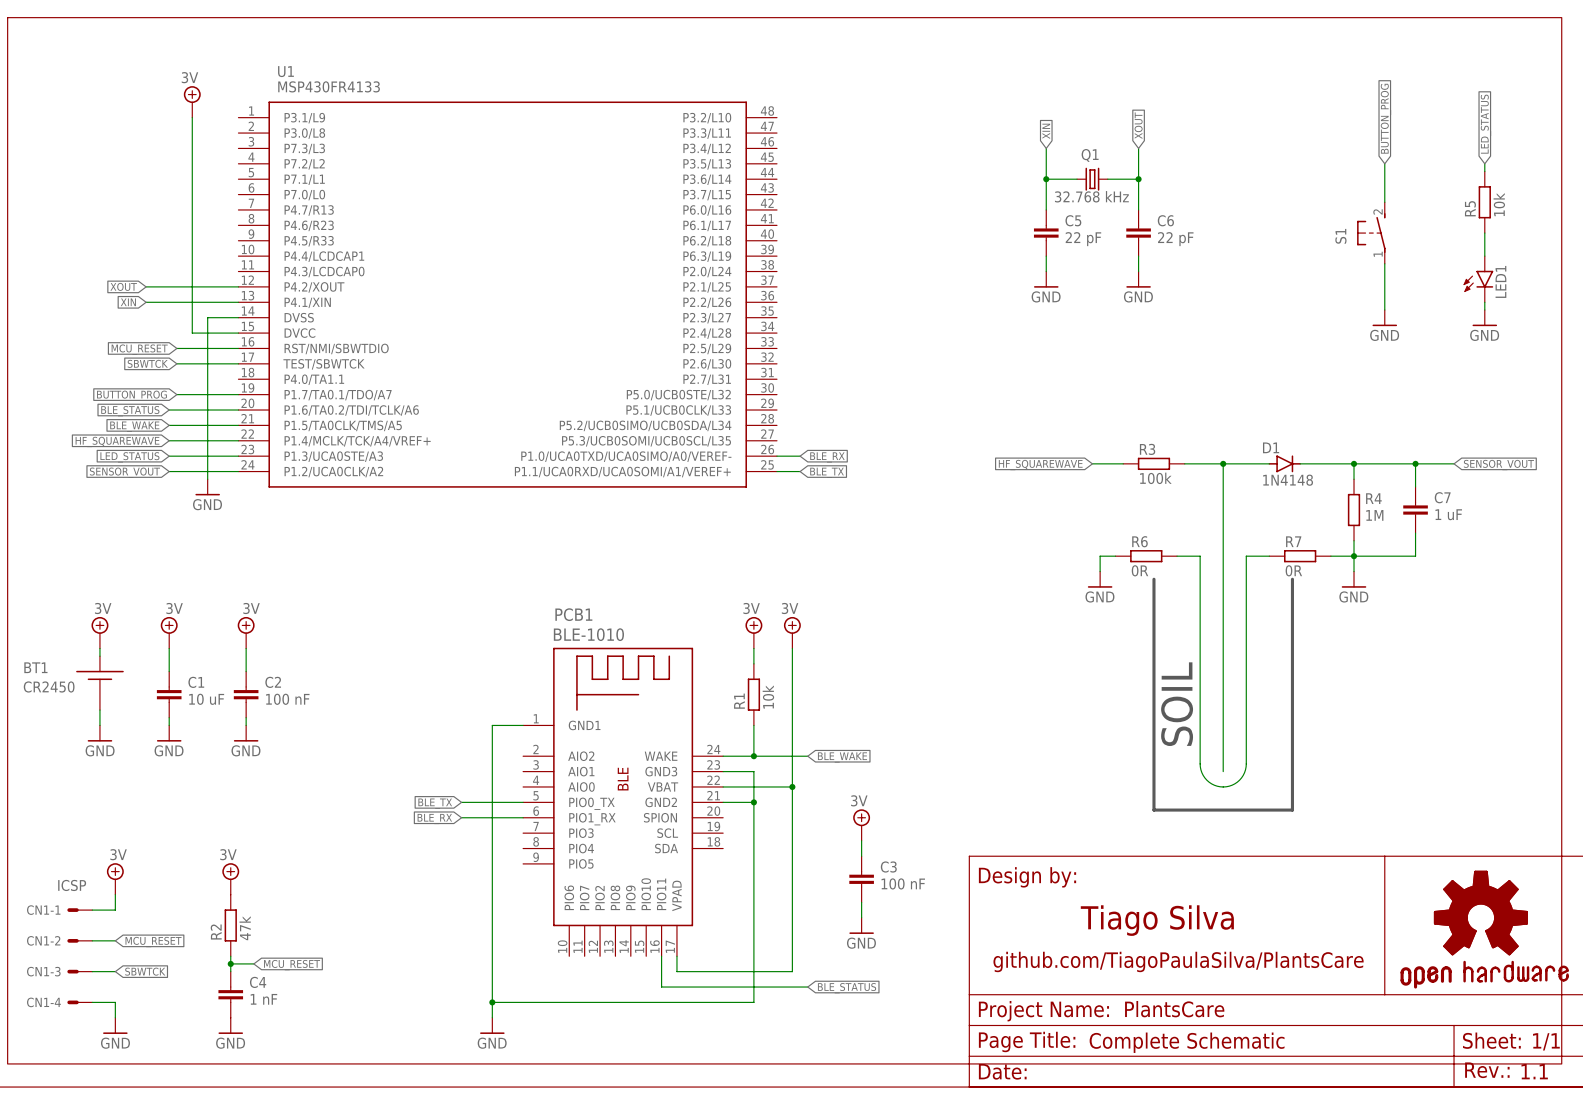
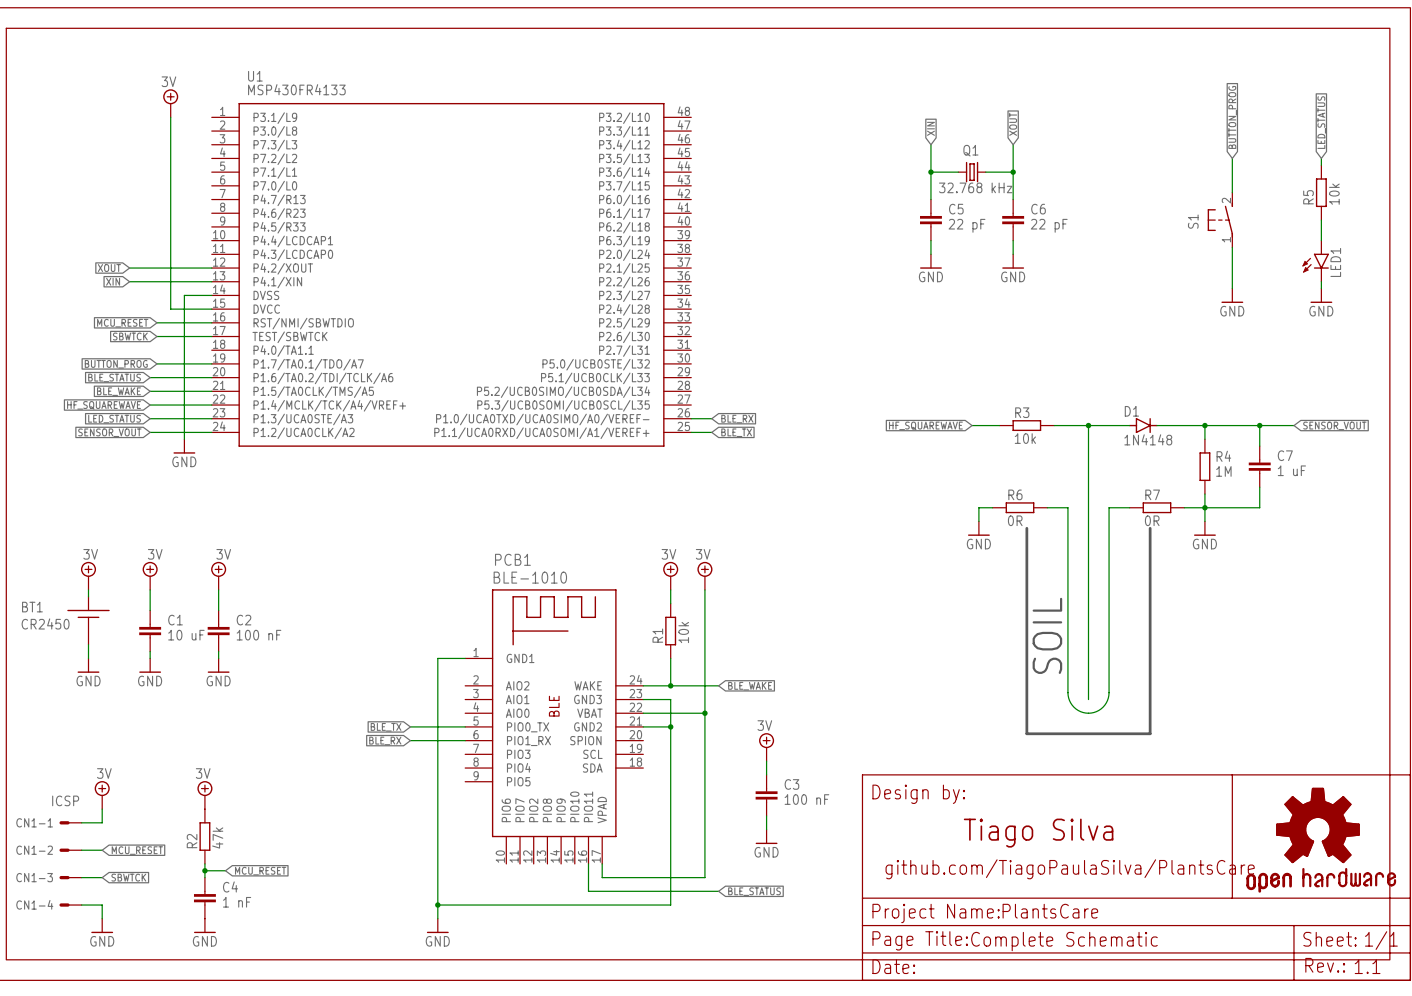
R3 value: 100k (1155, 478) -> 10k (1025, 438)

